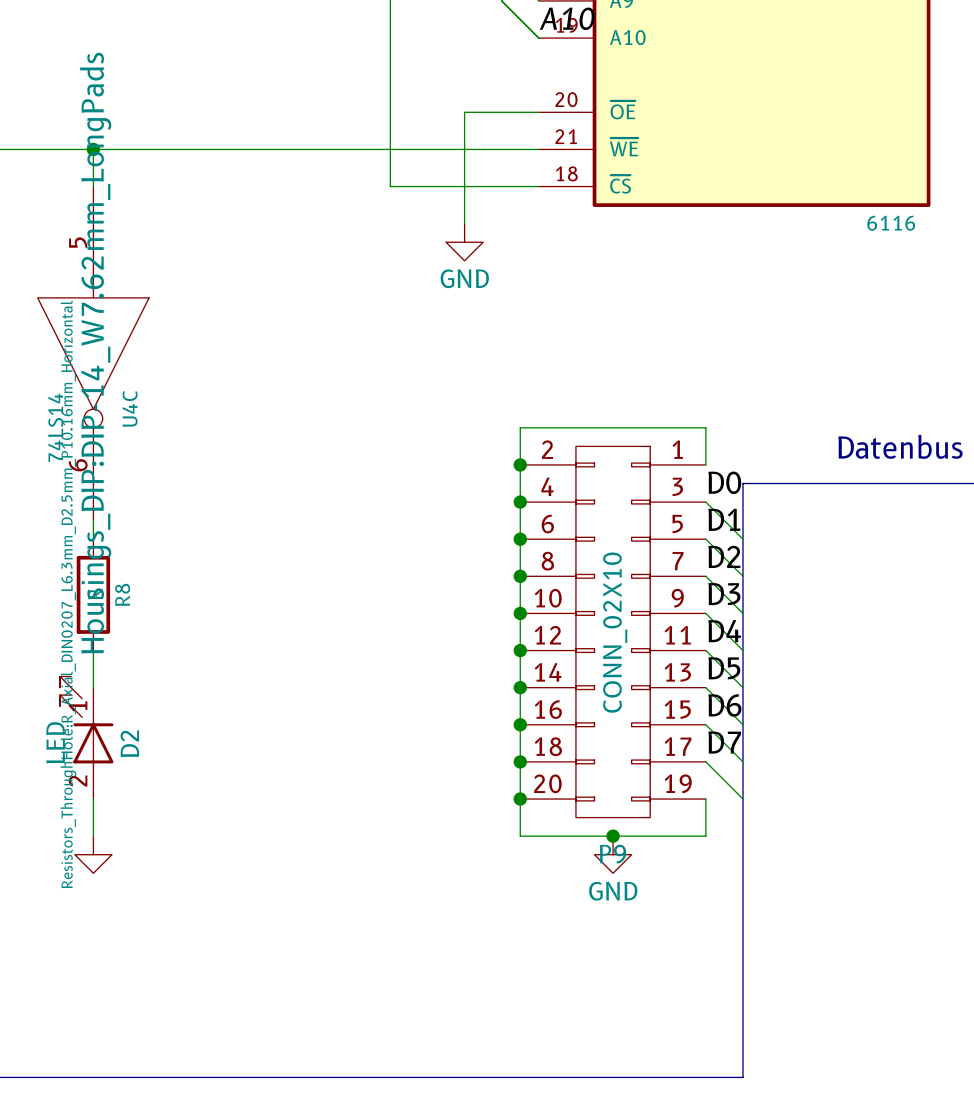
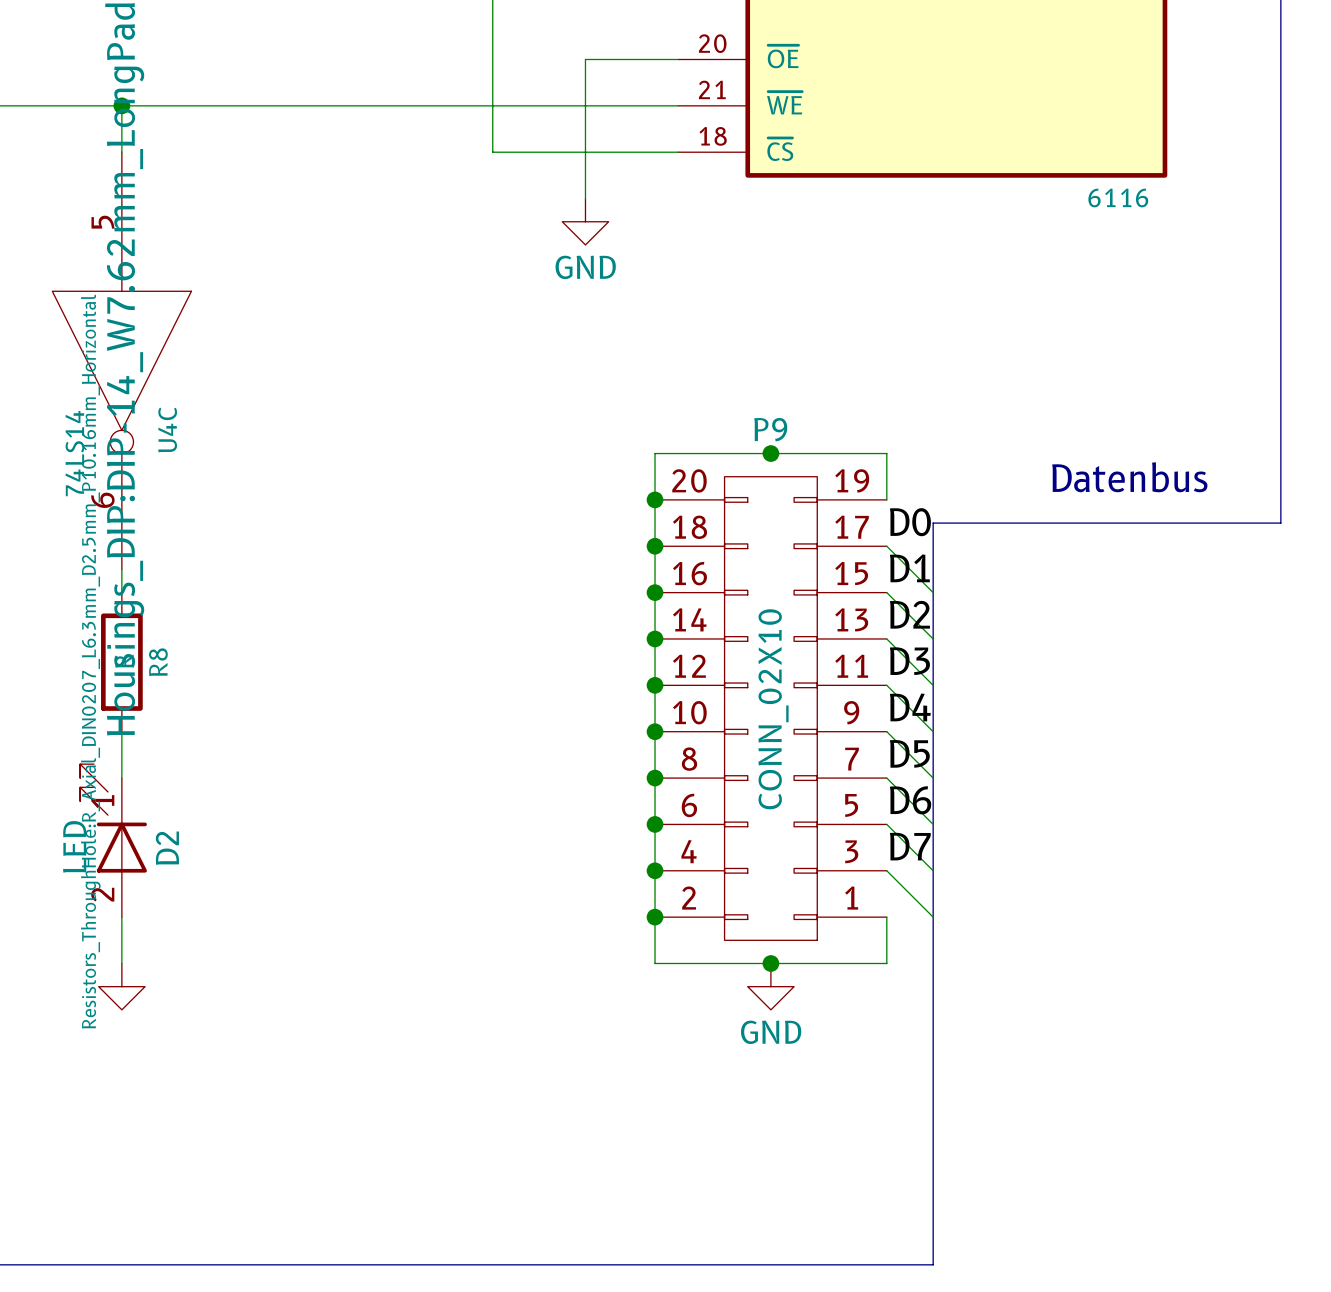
junction: none -> (770, 453)
P9 flip: as is (613, 631) -> up-down (770, 708)

